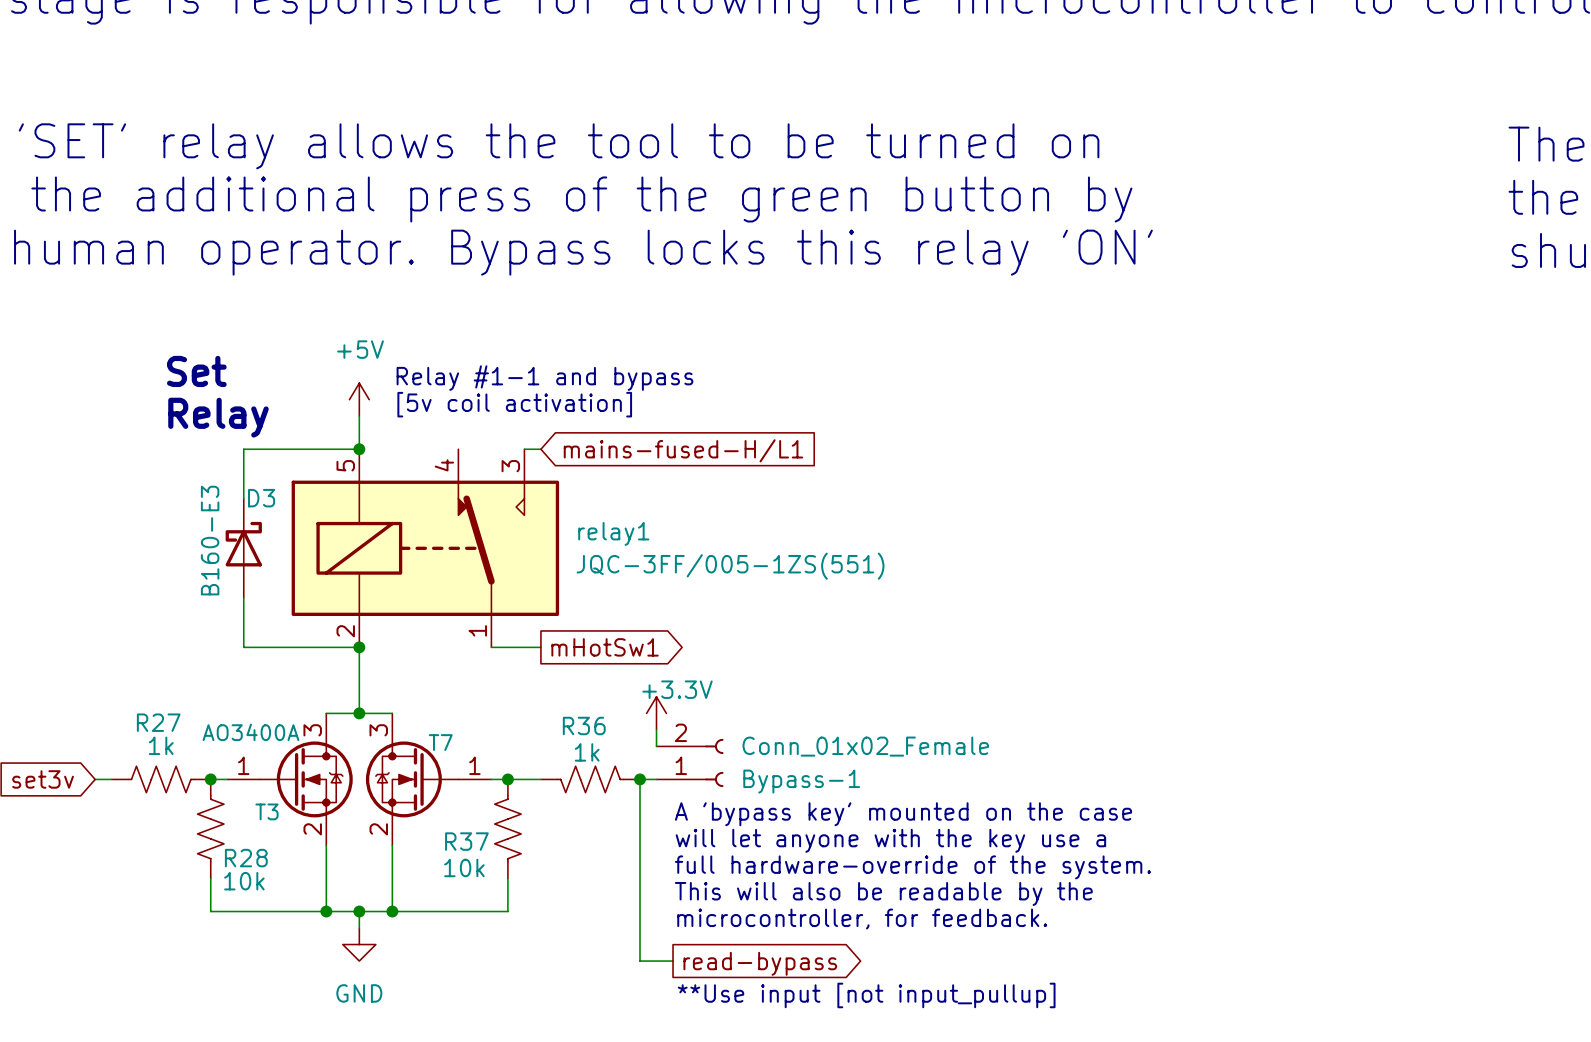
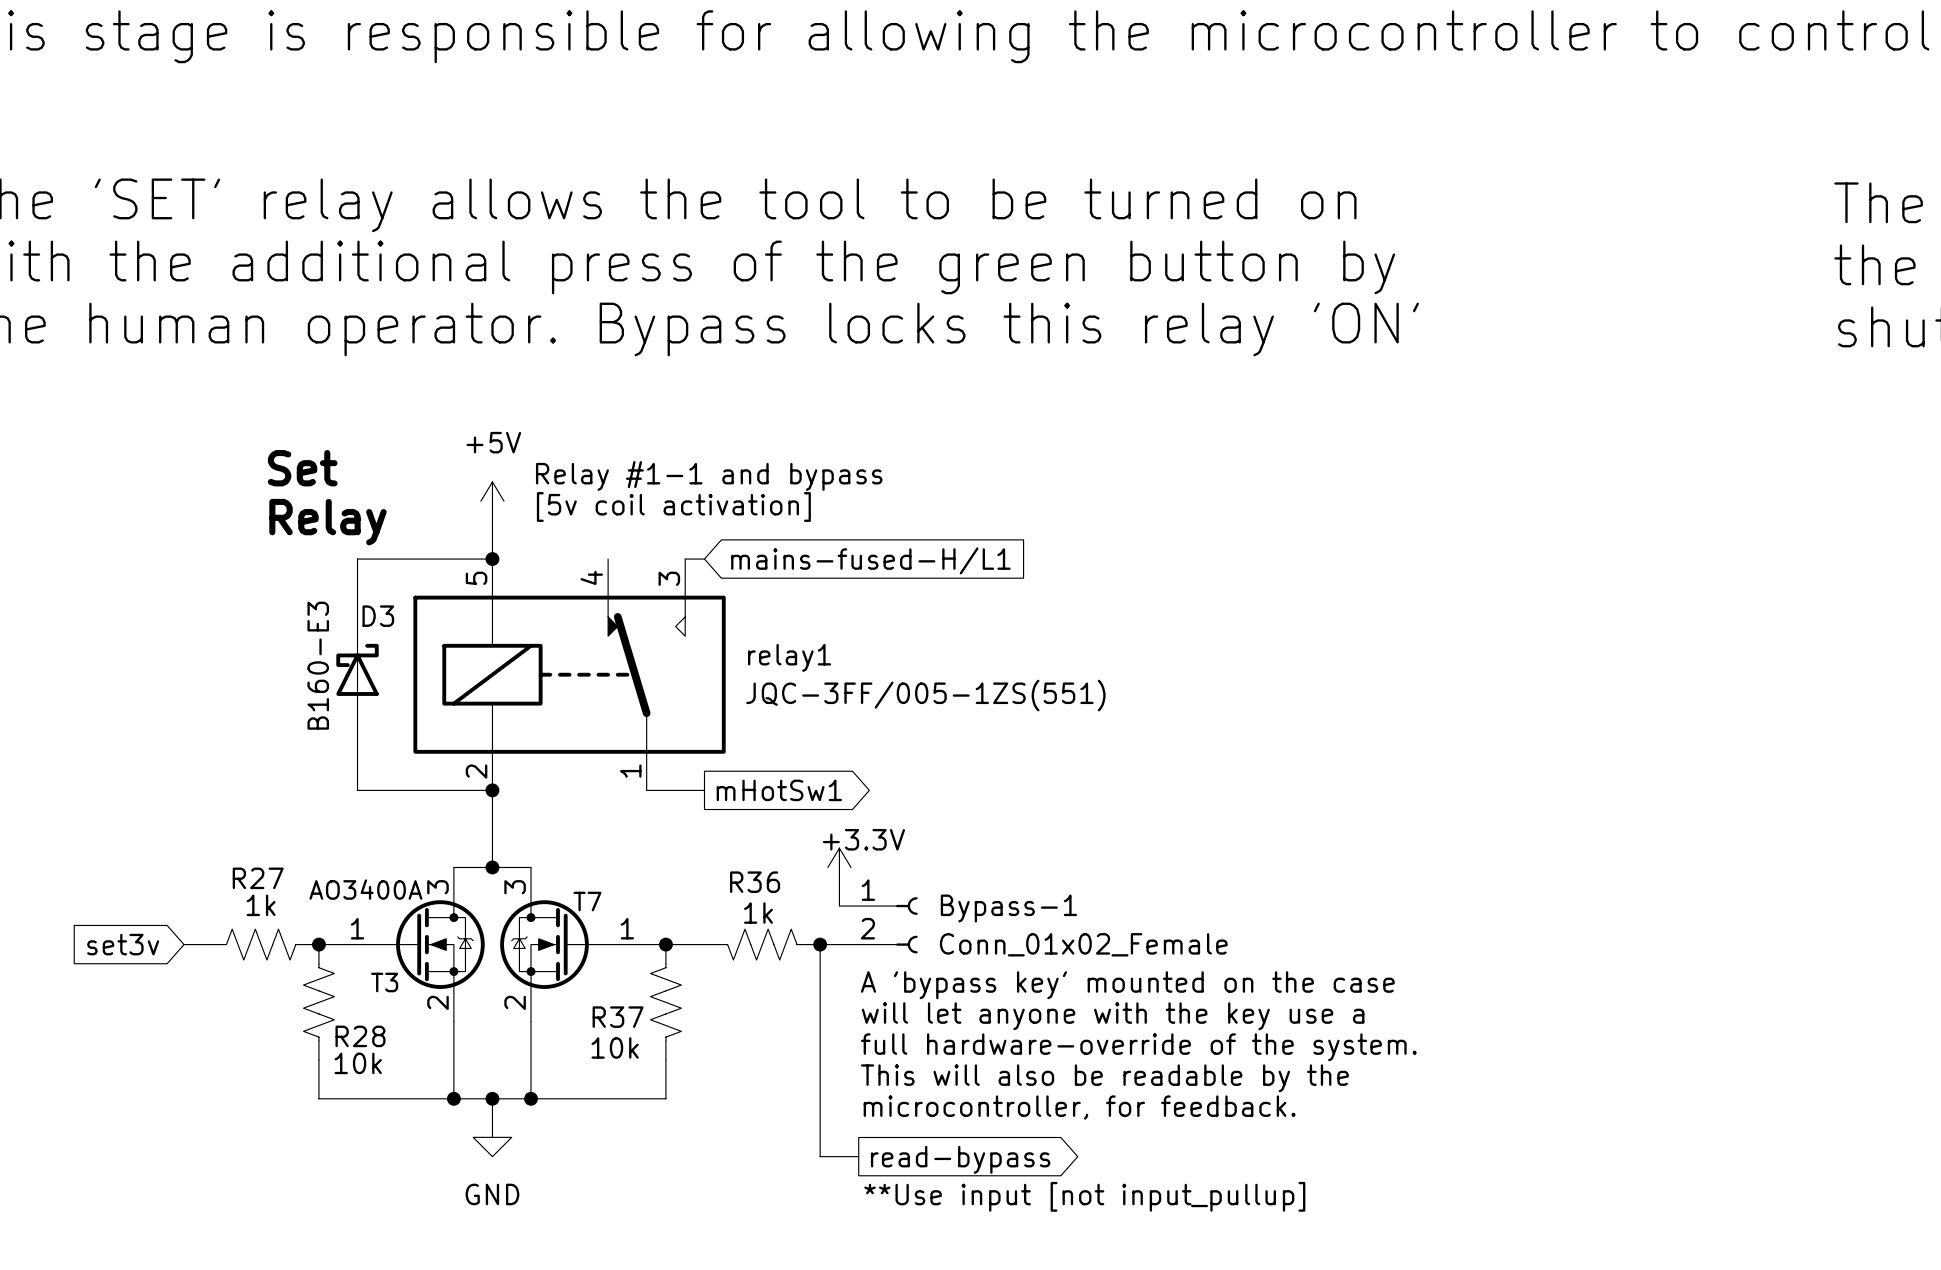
Bypass-1 flip: as is (714, 762) -> up-down (906, 925)

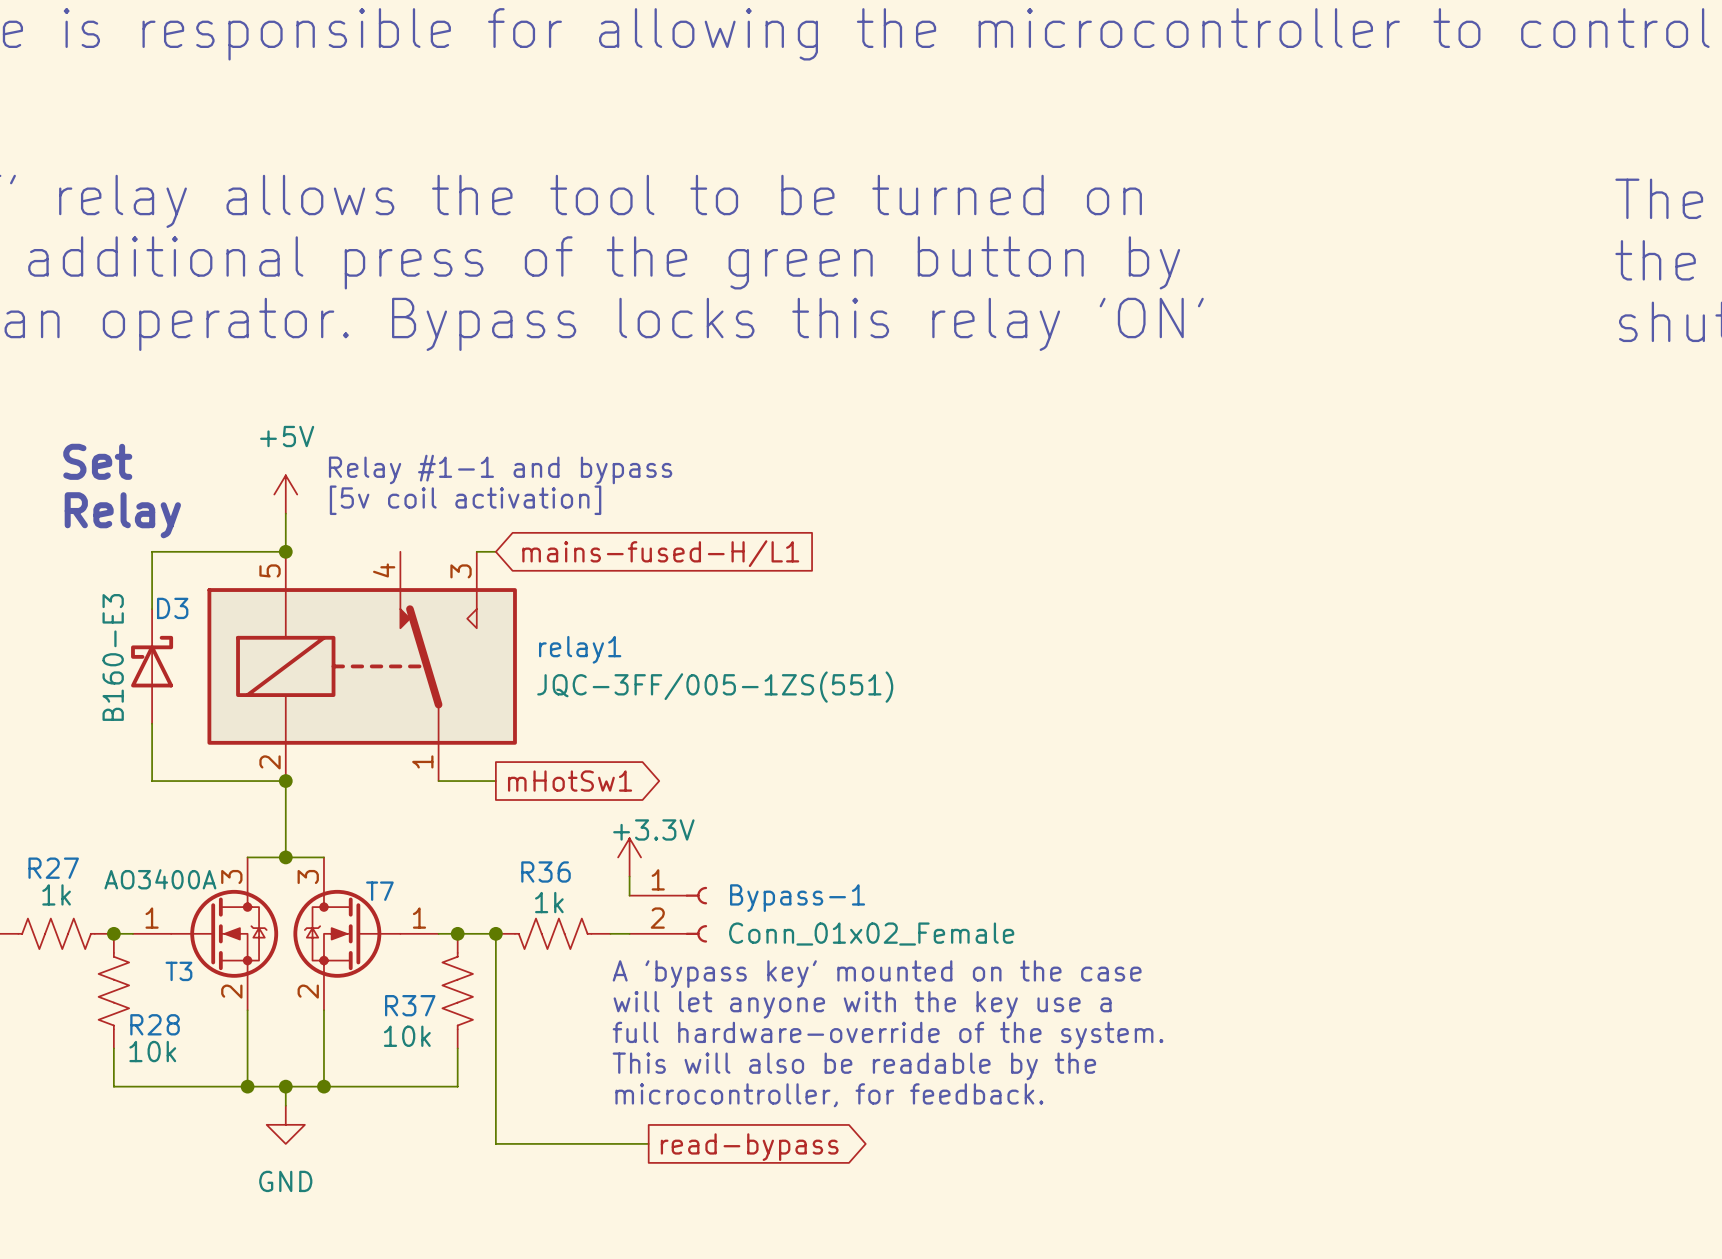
junction: none -> (495, 933)
wire: (820, 944) (820, 1156) -> (495, 933) (495, 1143) (610, 1143)
junction: (820, 944) -> none
text position: A 'bypass key' mounted on the case (1127, 985) -> A 'bypass key' mounted on the case (877, 974)
text position: will let anyone with the key use a (1113, 1016) -> will let anyone with the key use a (862, 1004)
text position: full hardware-override of the system. (1138, 1047) -> full hardware-override of the system. (888, 1035)
text position: This will also be readable by the (1104, 1078) -> This will also be readable by the (854, 1066)
text position: microcontroller, for feedback. (1079, 1107) -> microcontroller, for feedback. (829, 1095)
text: **Use input [not input_pullup] (1084, 1196) -> none

